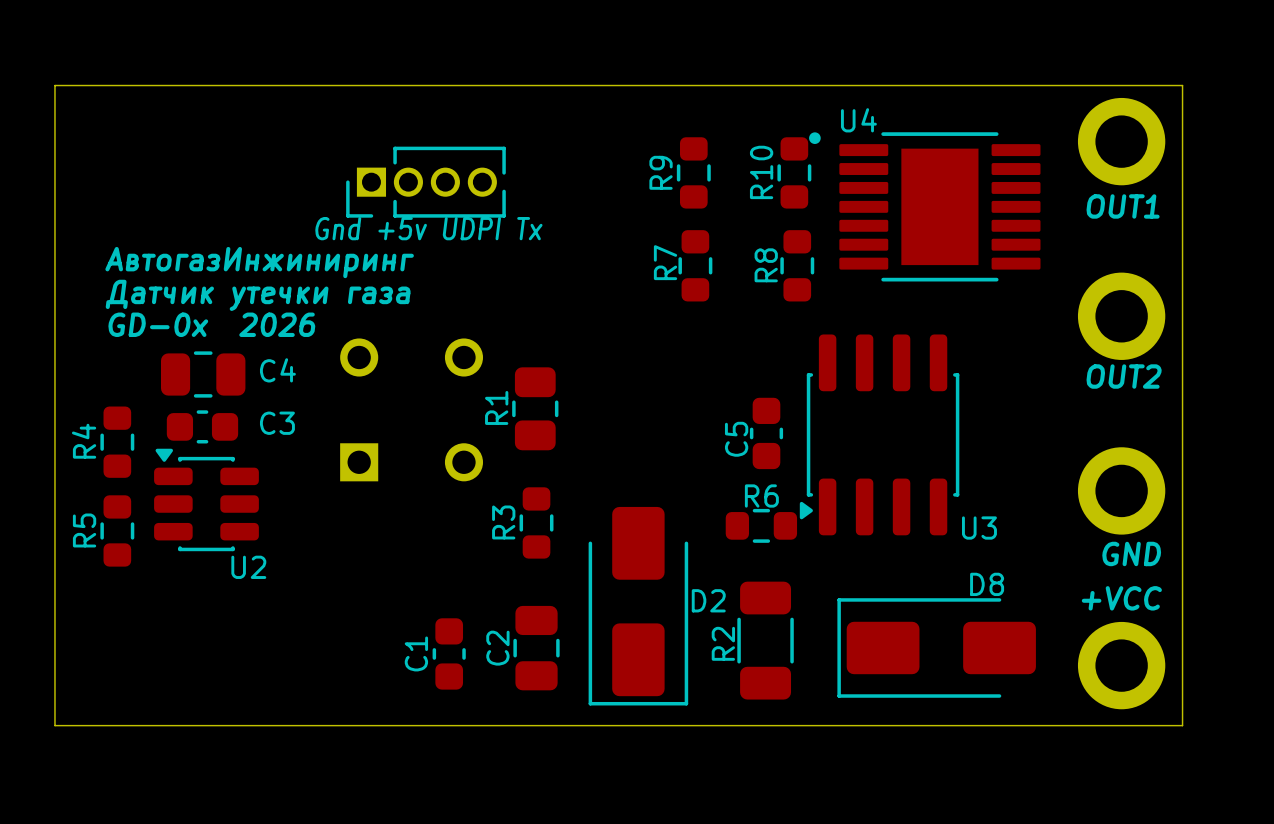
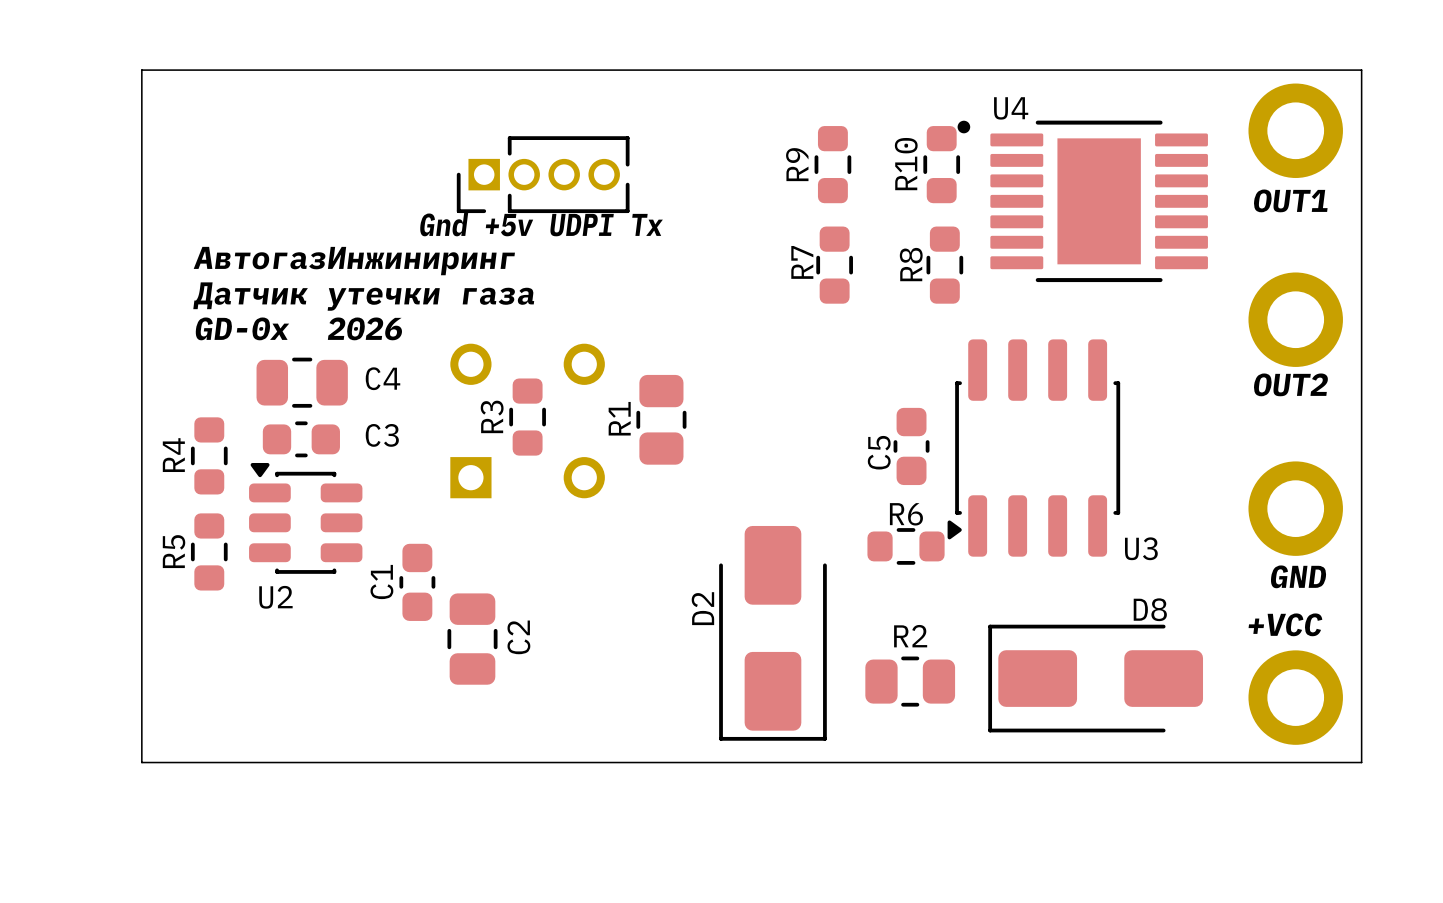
R3 position: (536, 522) -> (527, 417)
U2 name position: U2 (248, 567) -> U2 (275, 597)
R2 footprint: [737, 581, 794, 700] -> [865, 656, 956, 707]
D2 name rotation: 0° (708, 600) -> 90° counterclockwise (702, 608)
D2 name position: D2 (708, 600) -> D2 (702, 608)
R2 name position: R2 (723, 643) -> R2 (910, 636)
C2 name position: C2 (497, 648) -> C2 (518, 637)
C2 position: (536, 648) -> (472, 639)
C1 position: (449, 653) -> (417, 582)

